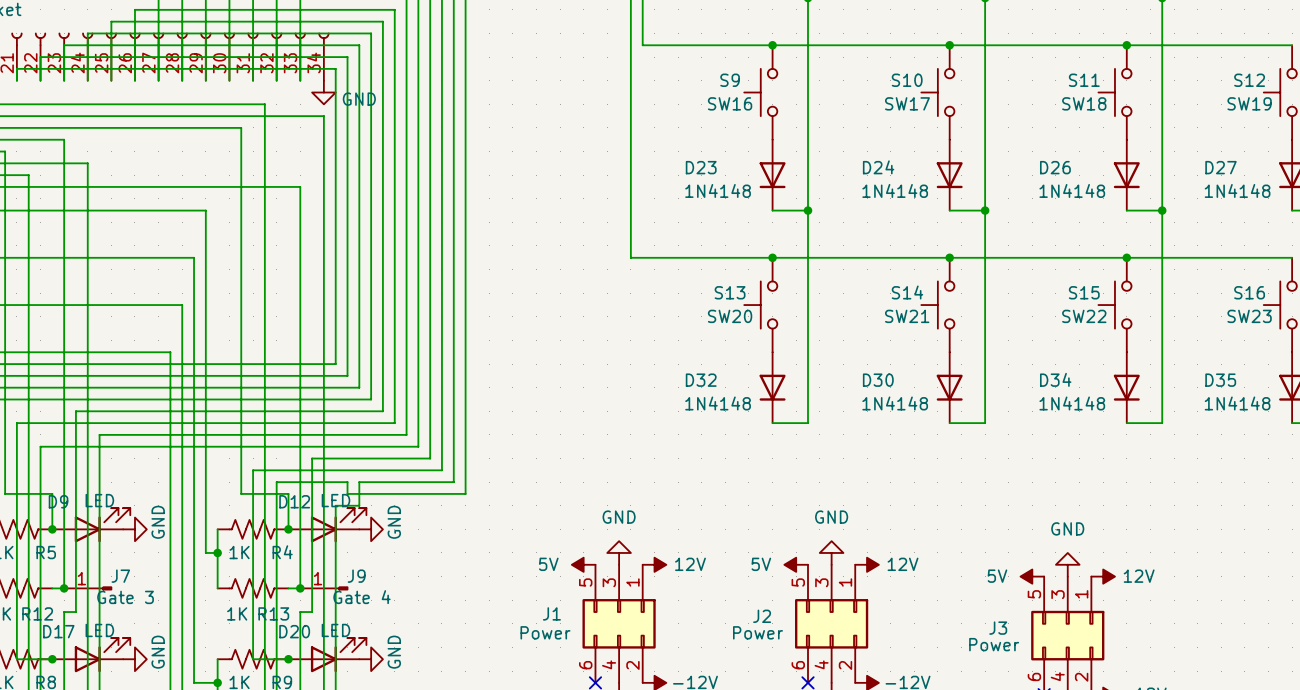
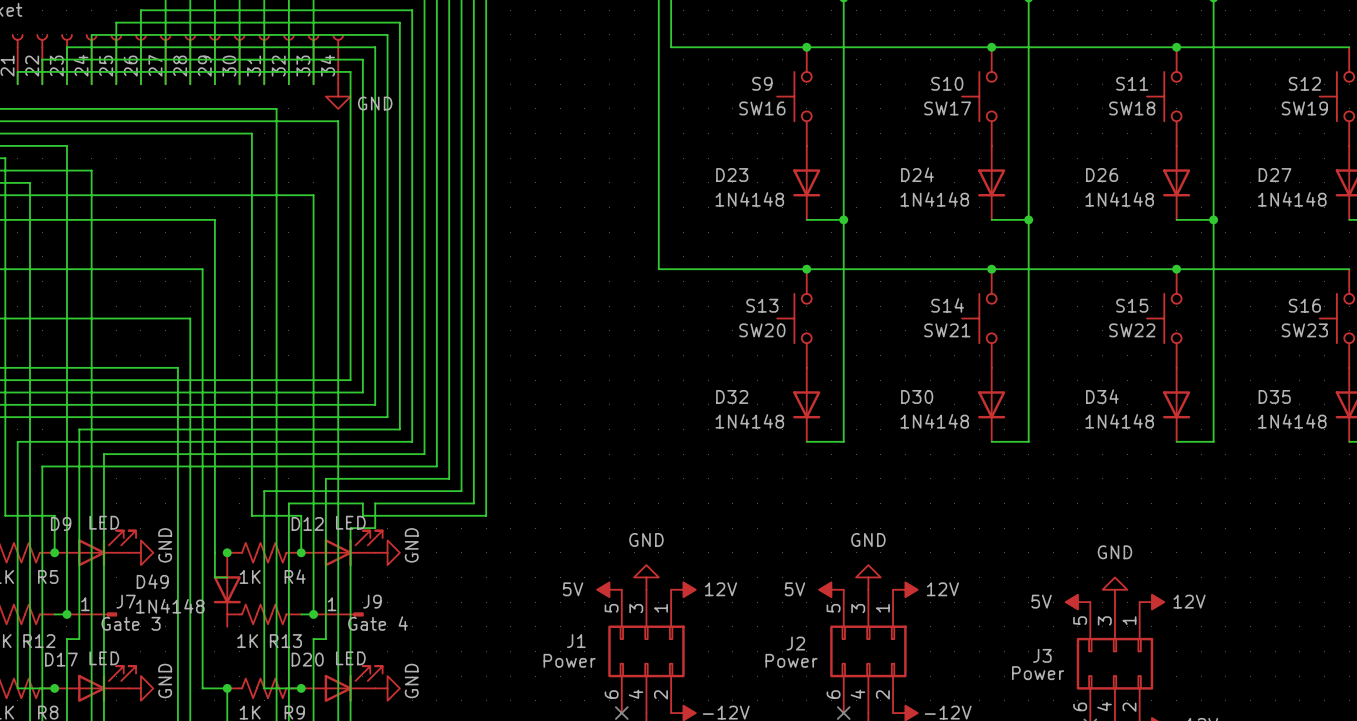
junction position: (217, 552) -> (227, 552)
D49: none -> 1N4148 (227, 589)
wire: (194, 659) (194, 682) (217, 682) -> (202, 688) (227, 688)
junction position: (217, 682) -> (227, 688)

